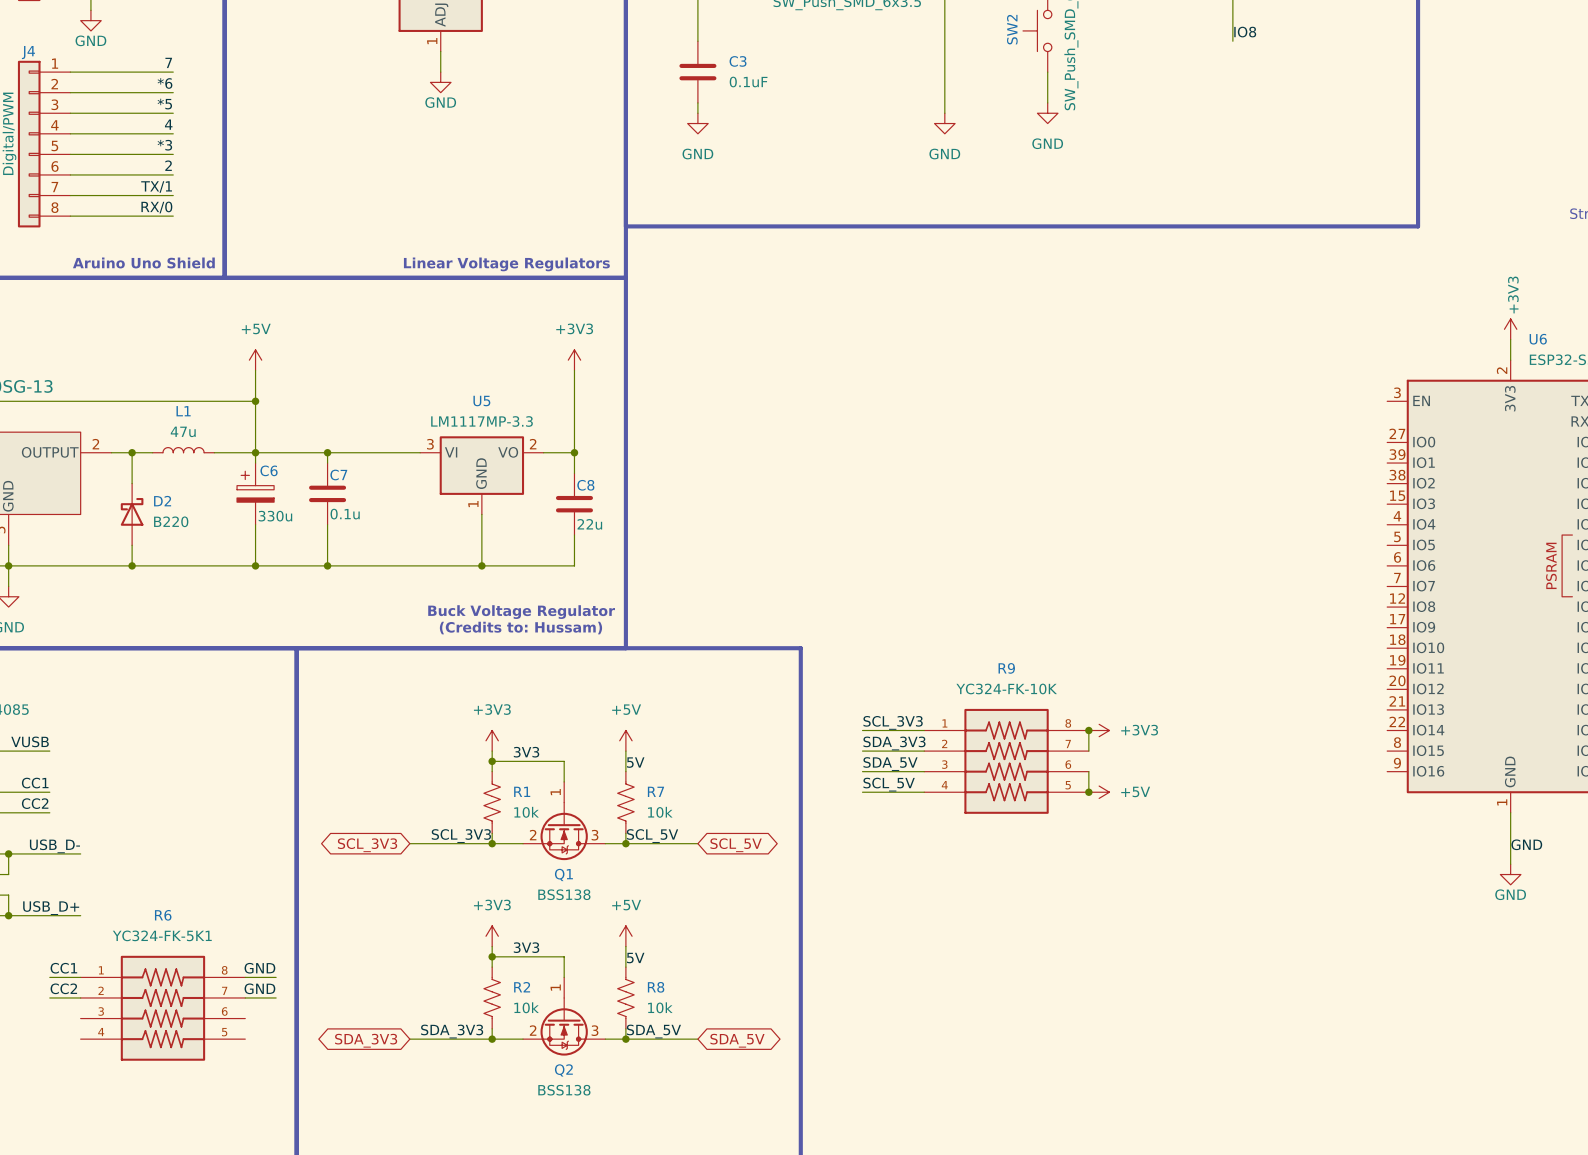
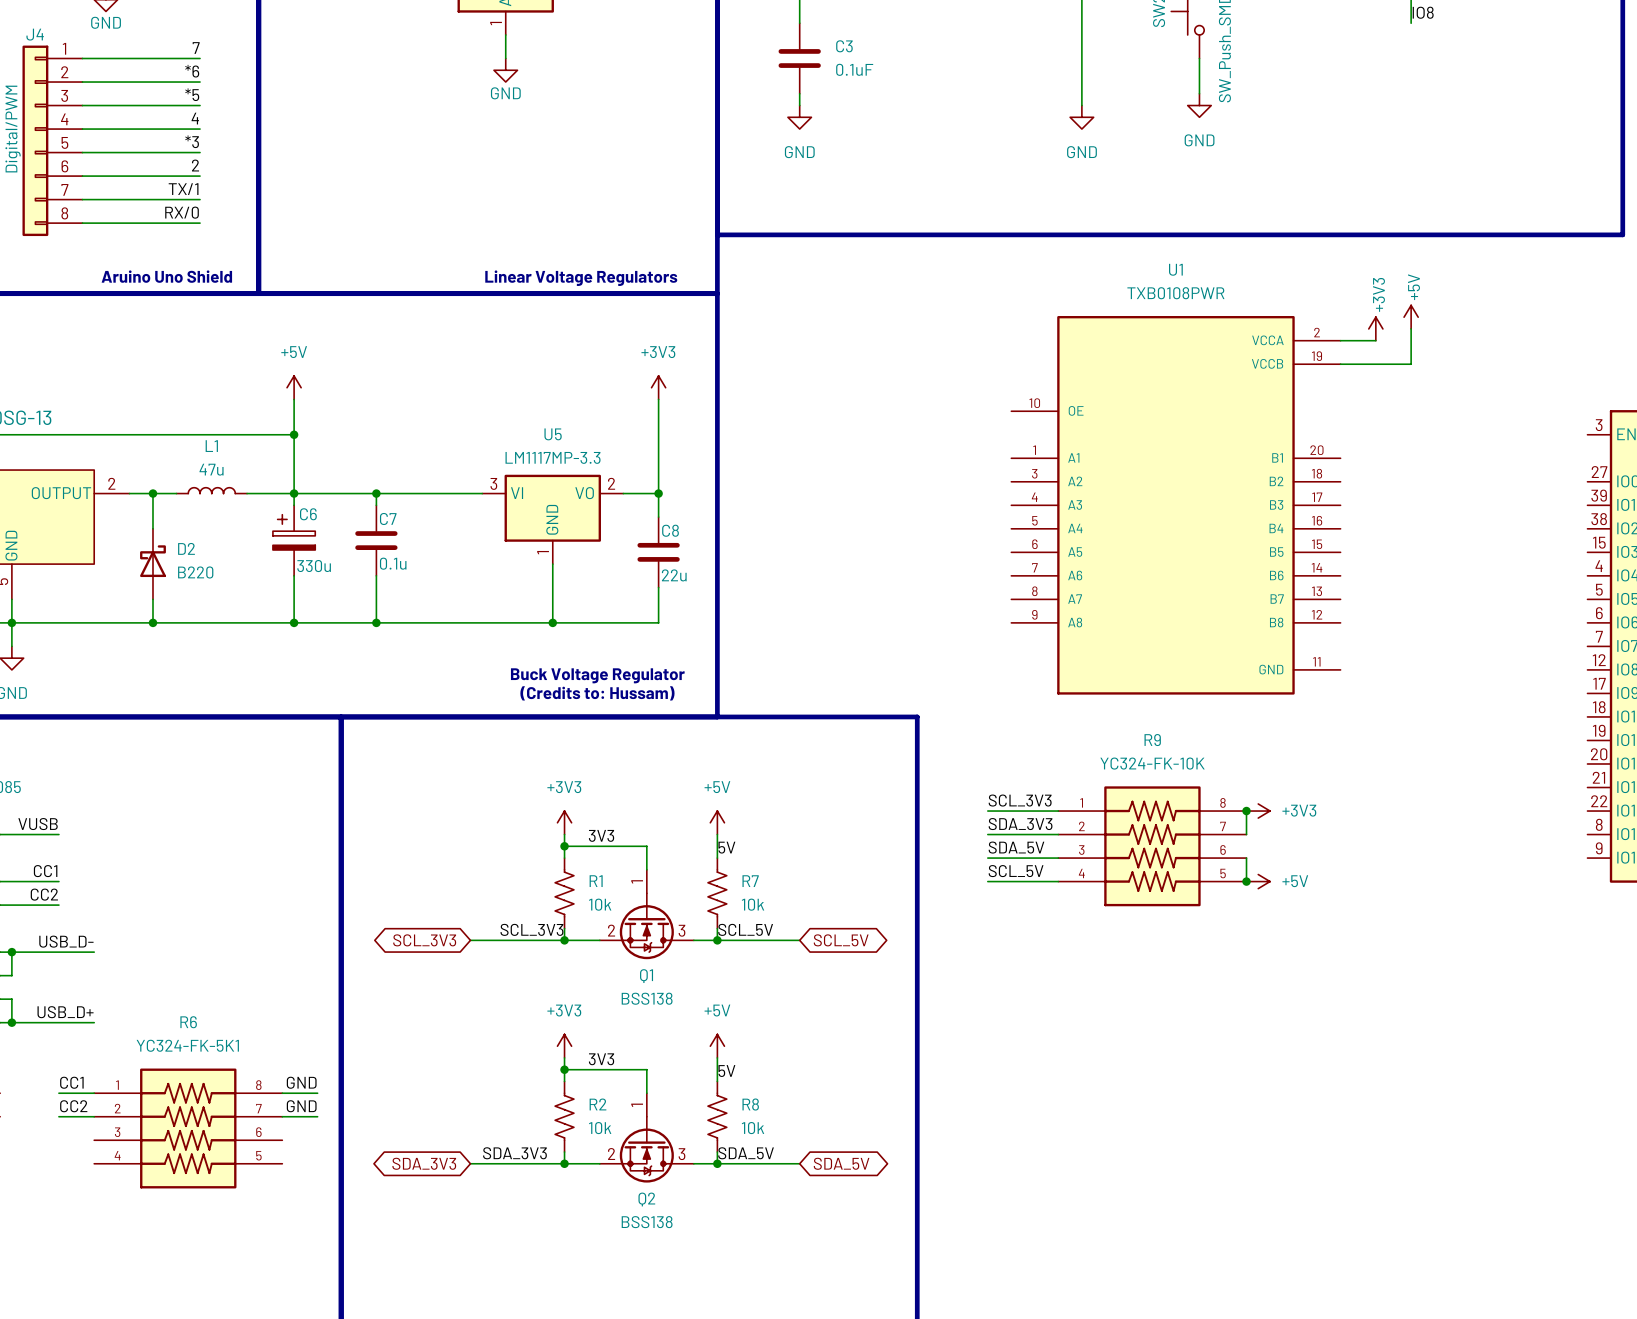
power symbol: none -> +5V (1411, 317)
power symbol: none -> +3V3 (1375, 328)
wire: none -> (1411, 328) (1411, 364) (1340, 364)
wire: none -> (1340, 340) (1375, 340)
U1: none -> TXB0108PWR (1175, 505)

